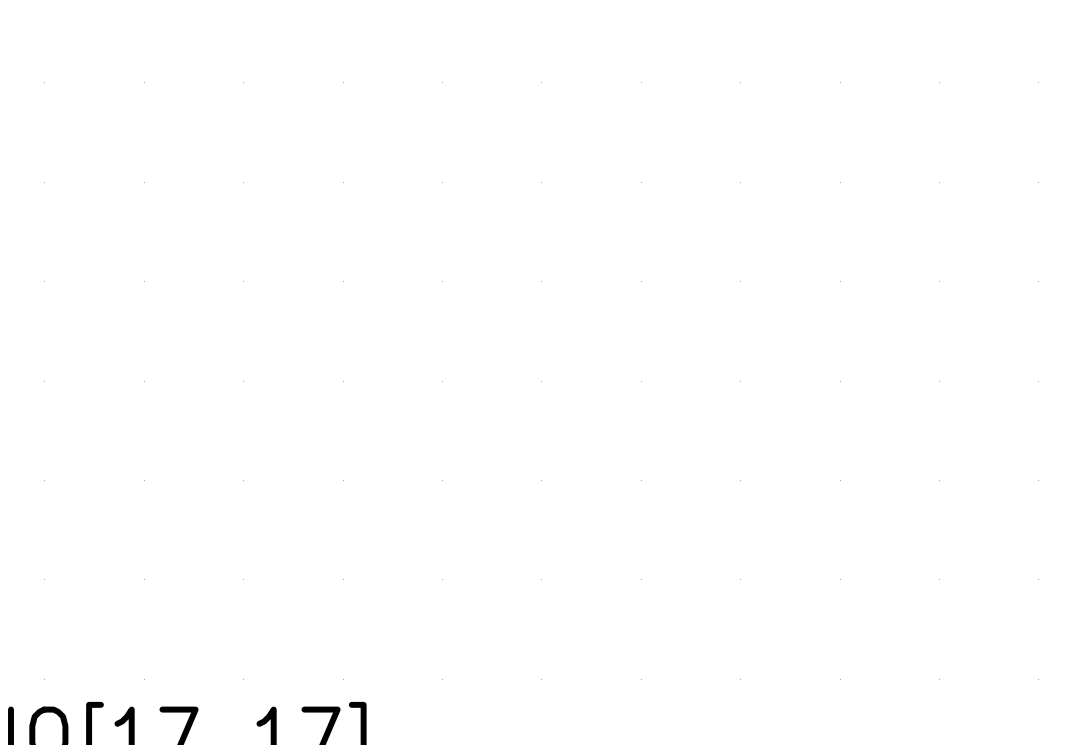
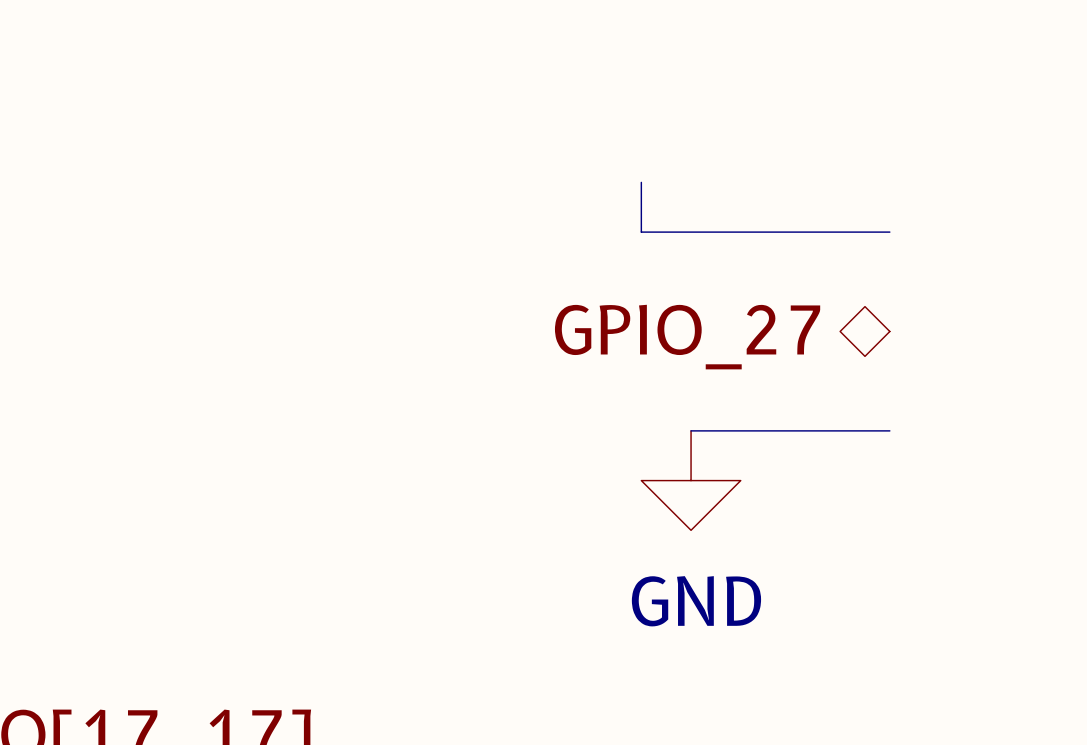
wire: none -> (641, 182) (641, 232) (889, 232)
hierarchical label: none -> GPIO_27 (687, 337)
wire: none -> (691, 430) (889, 430)
power symbol: none -> GND (691, 480)

